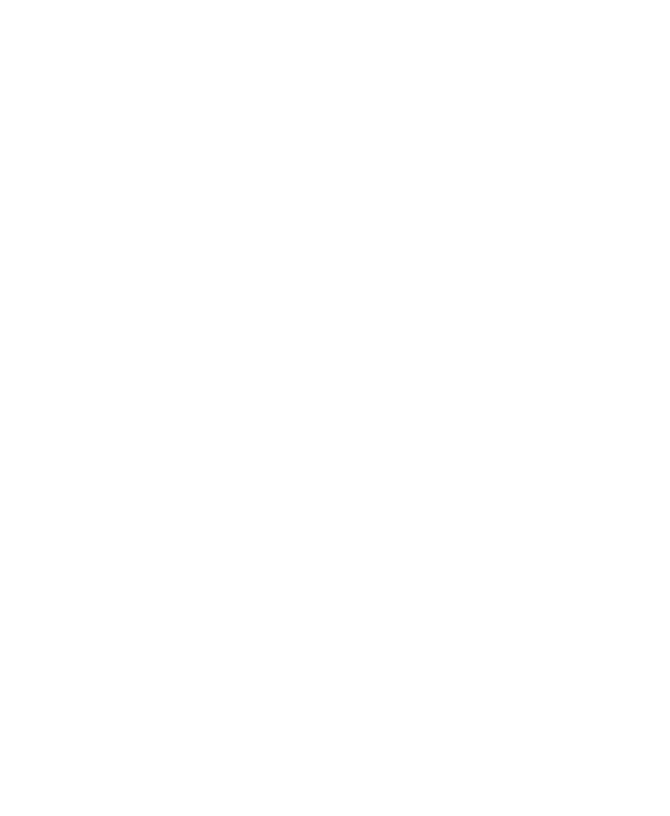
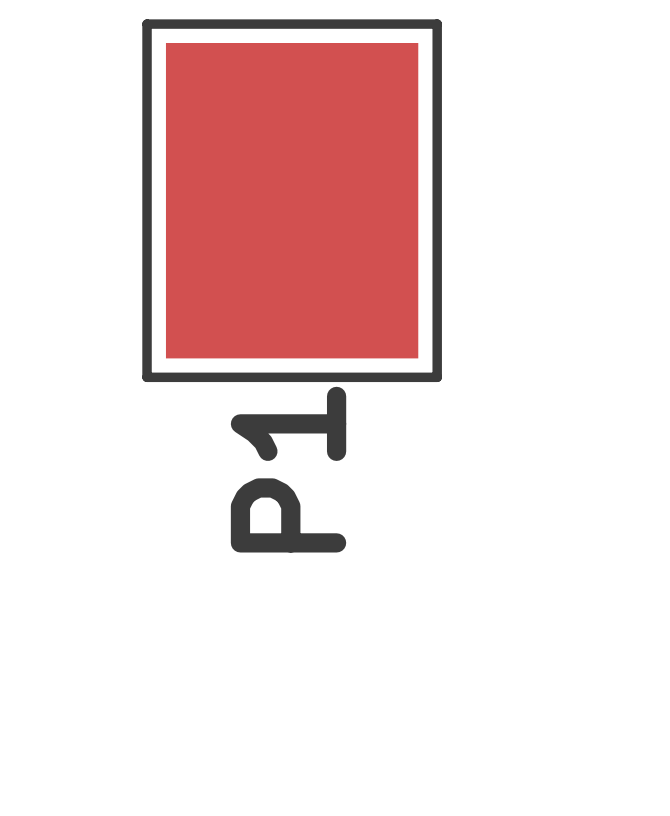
P1: none -> (292, 200)

